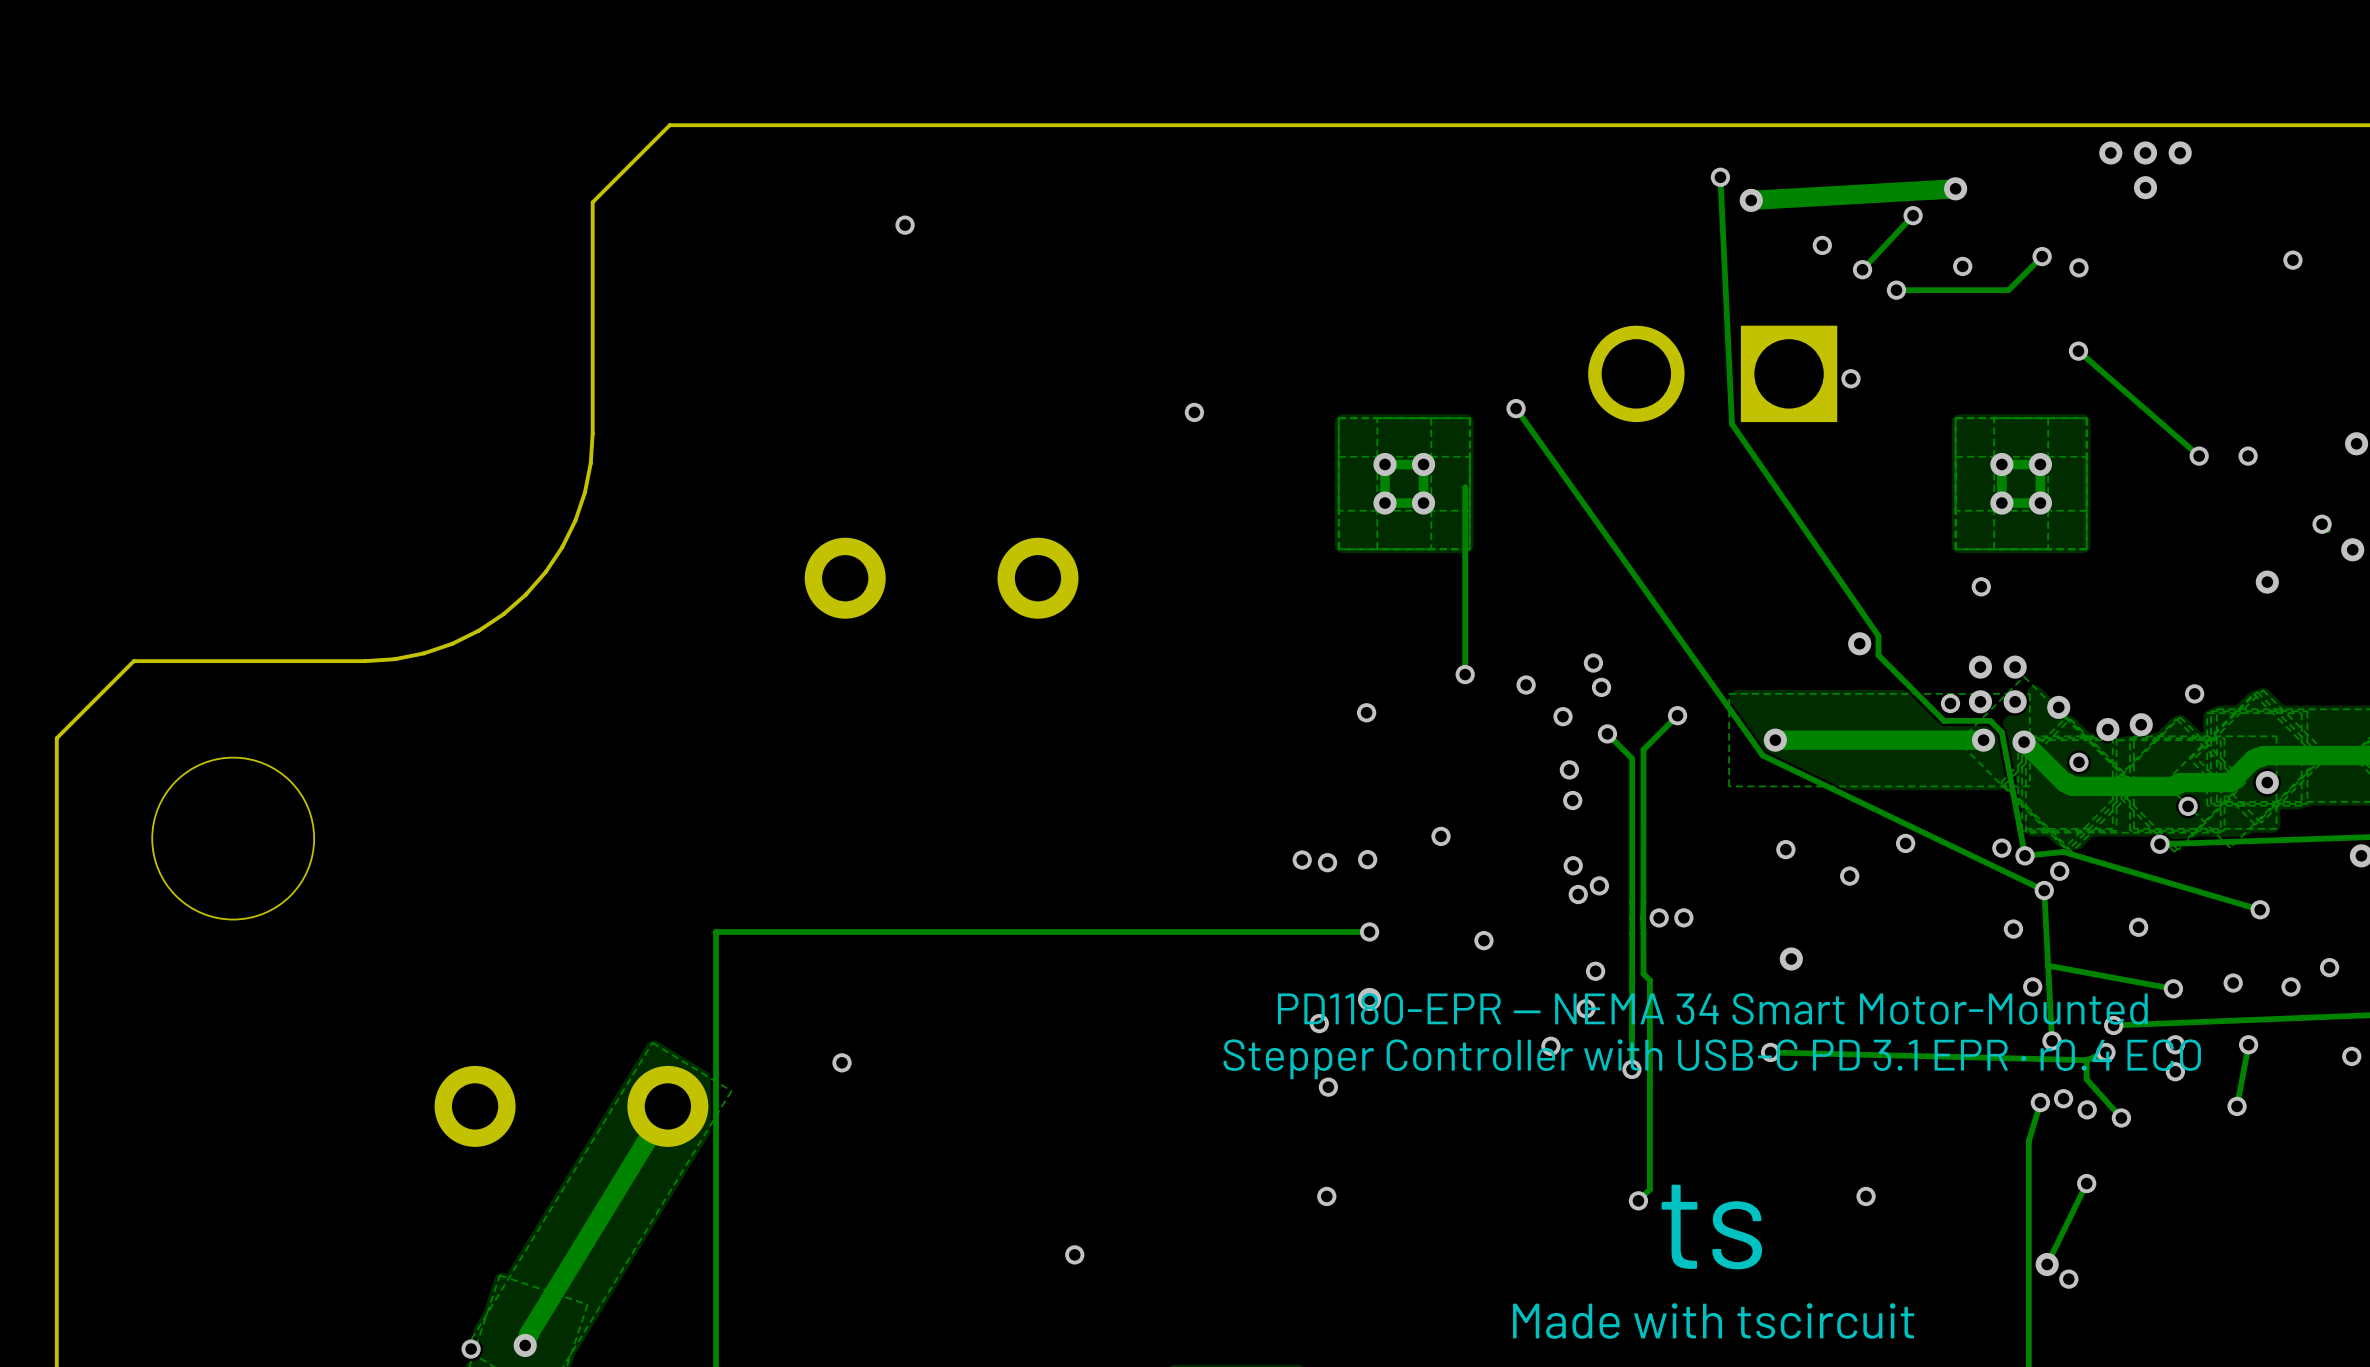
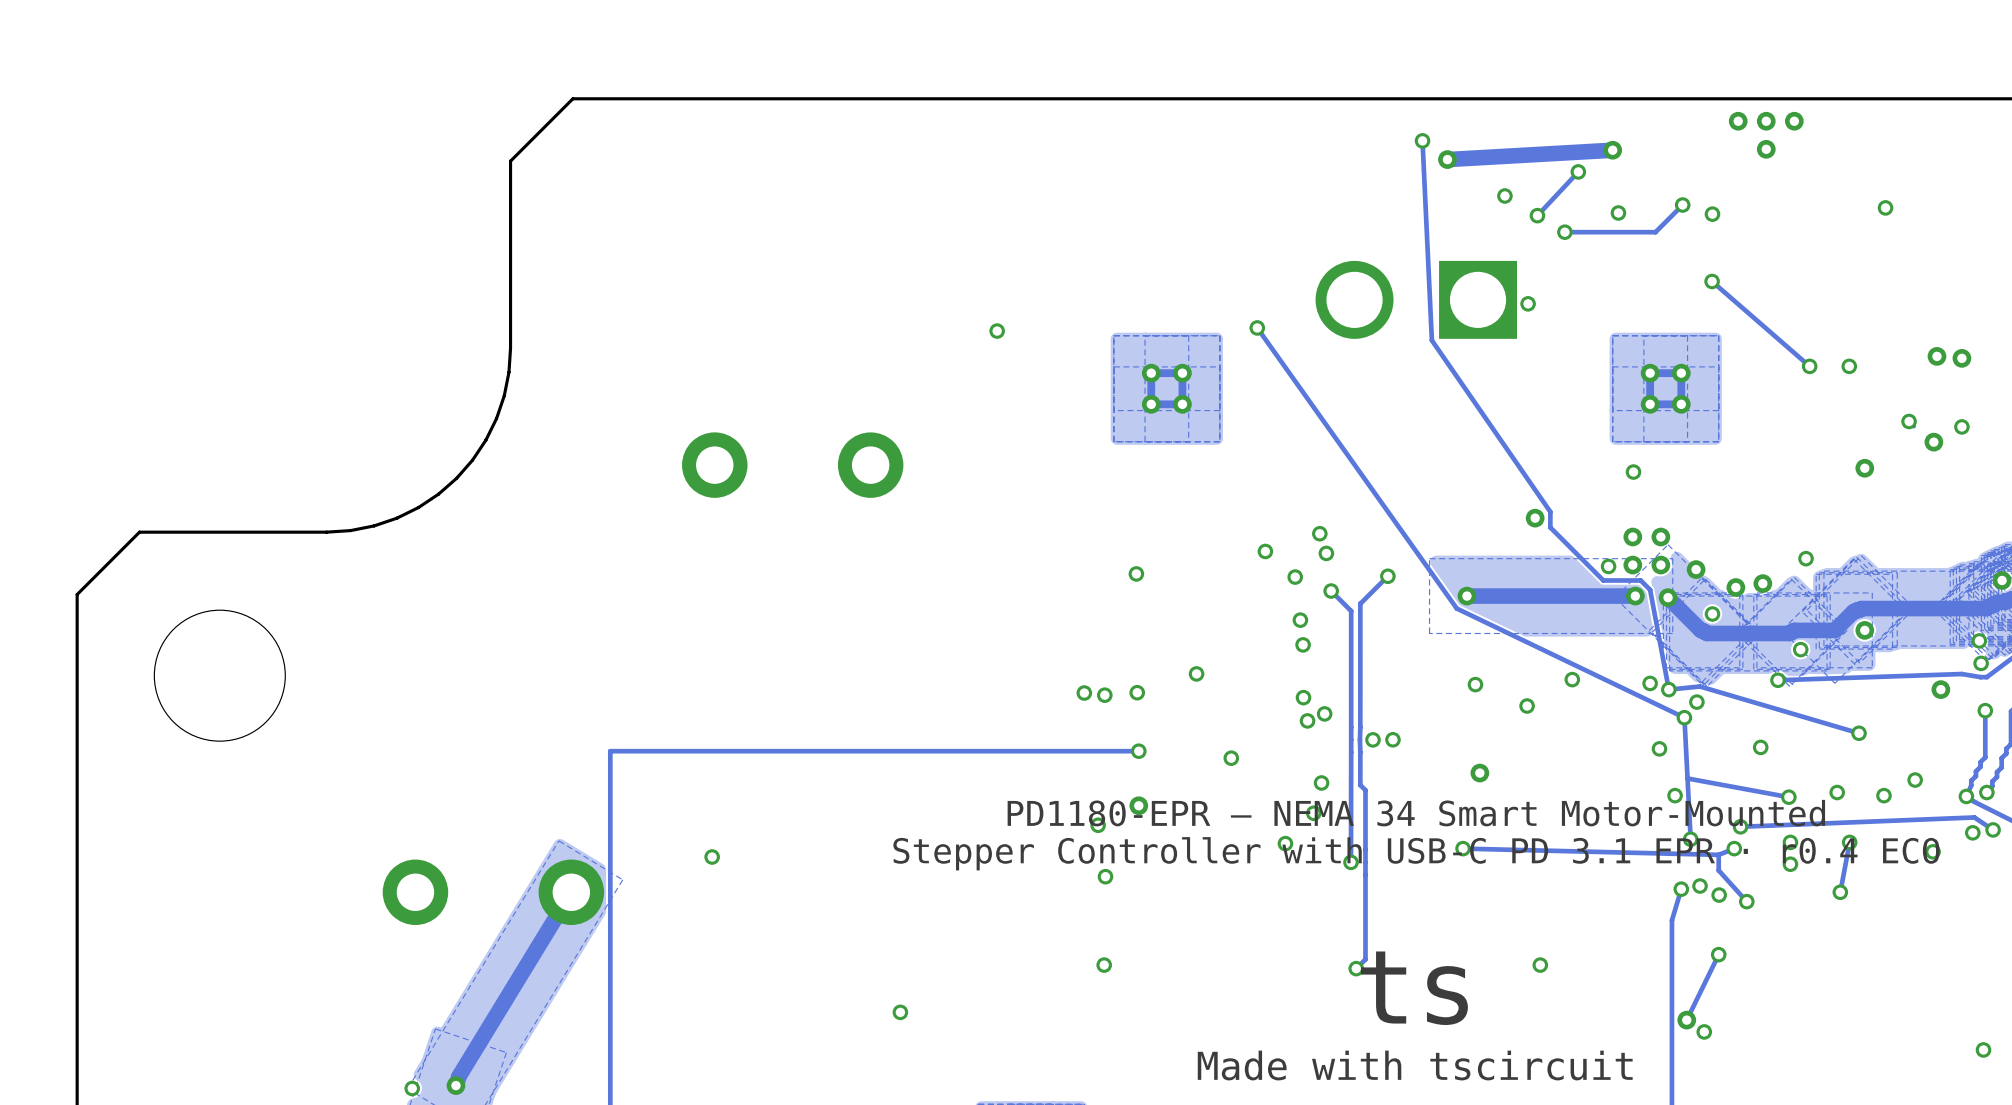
via: (905, 225) -> none
track: (1465, 487) (1465, 674) -> none
via: (1465, 674) -> none

